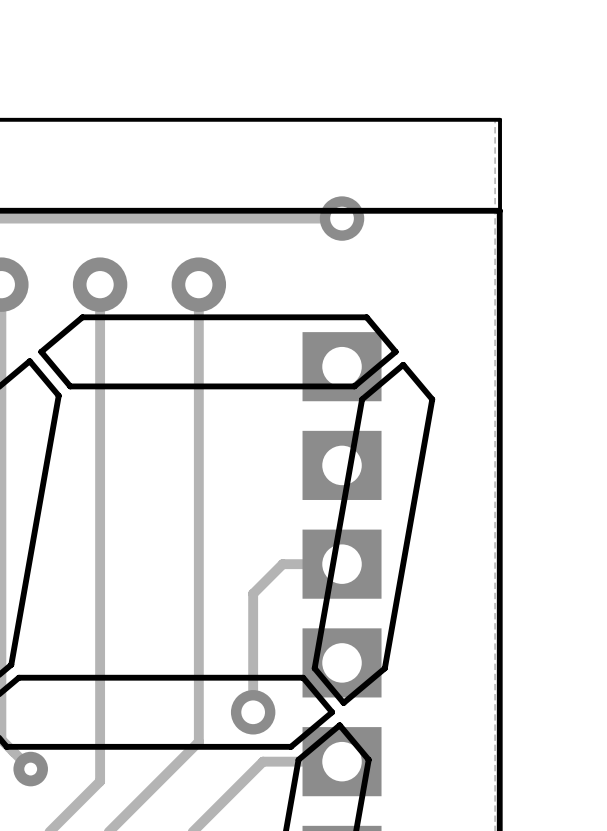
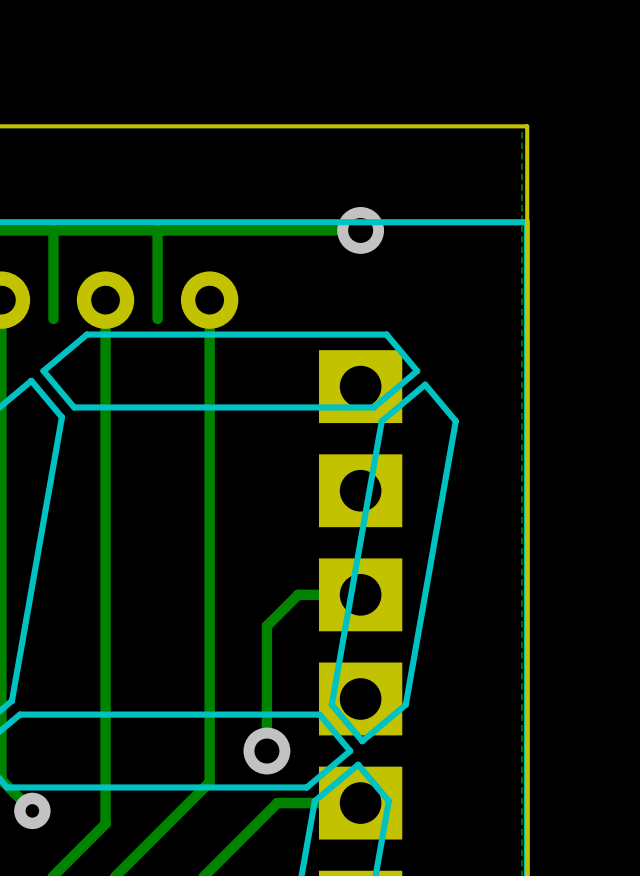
track: none -> (53, 230) (53, 318)
track: none -> (157, 230) (157, 318)

